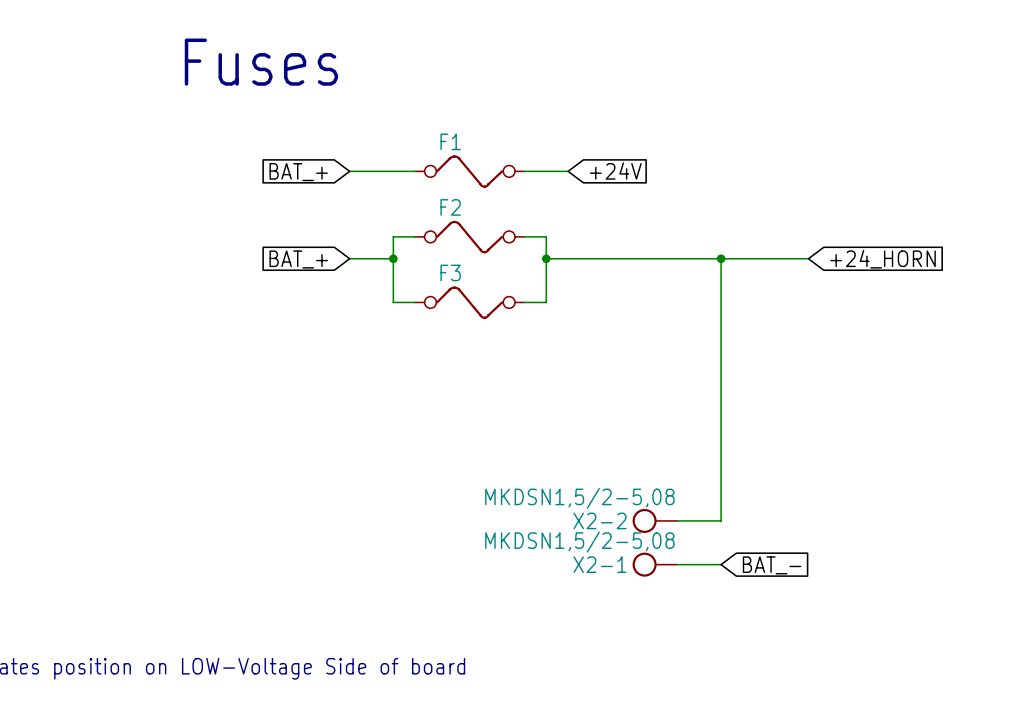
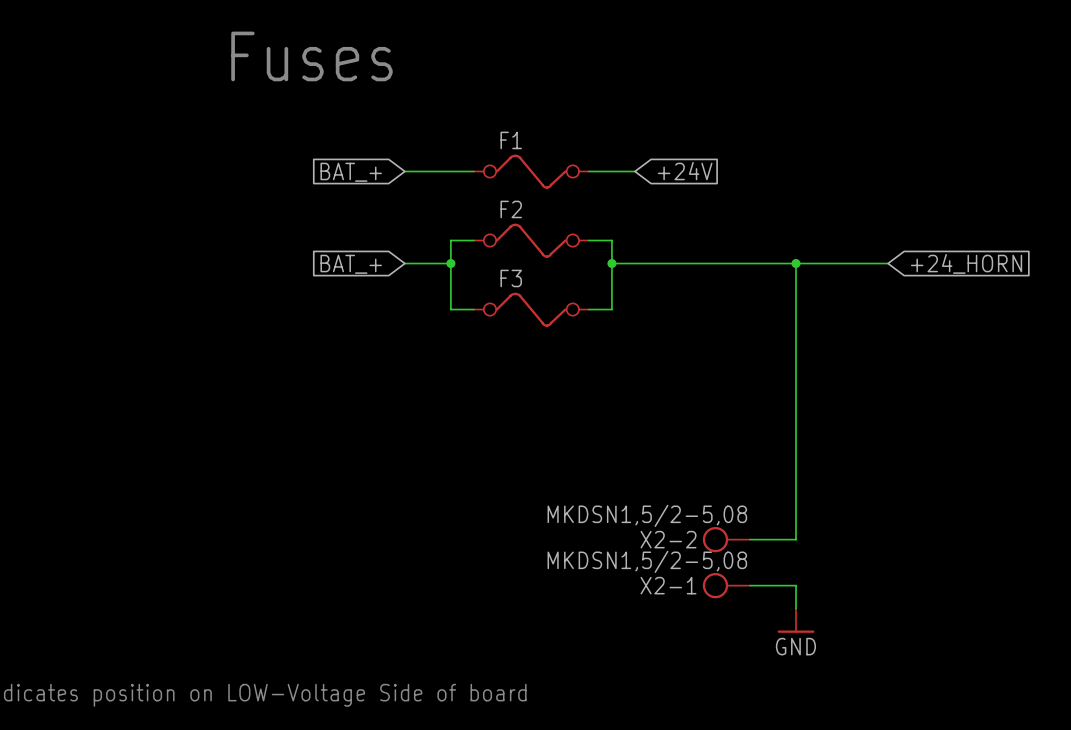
wire: none -> (796, 585) (796, 608)
global label: BAT_- (772, 565) -> none
power symbol: none -> GND (796, 620)

